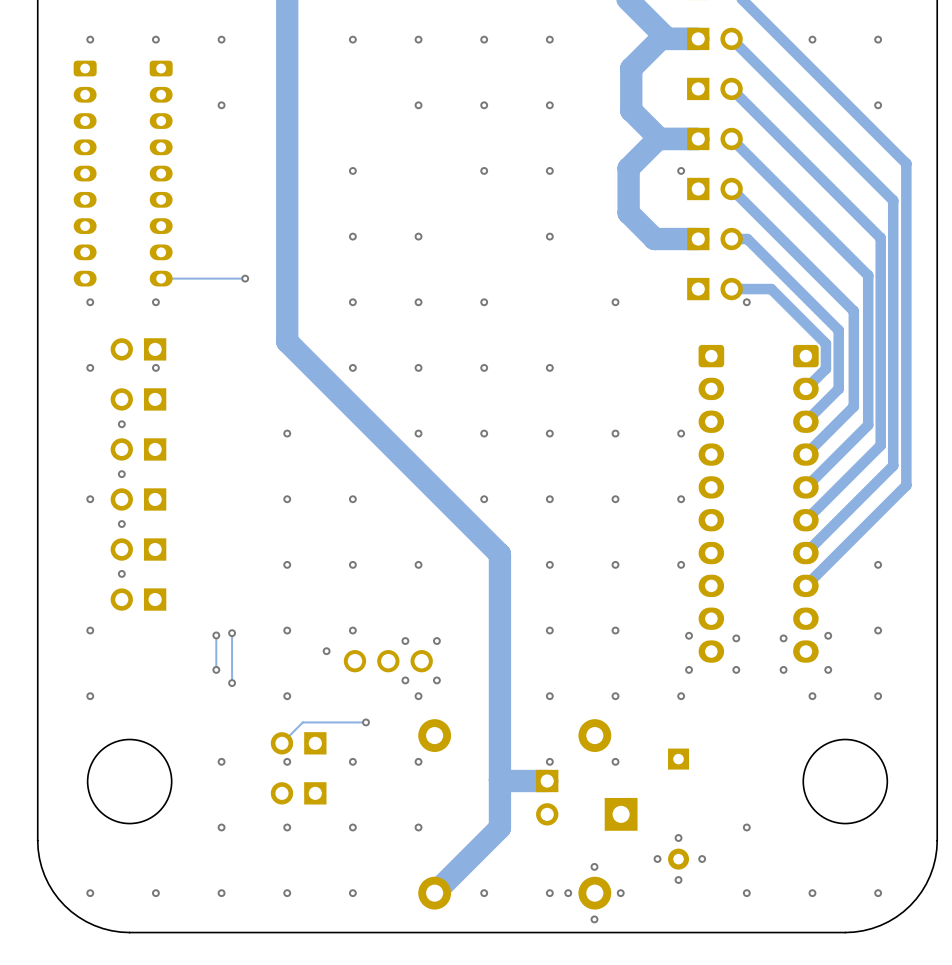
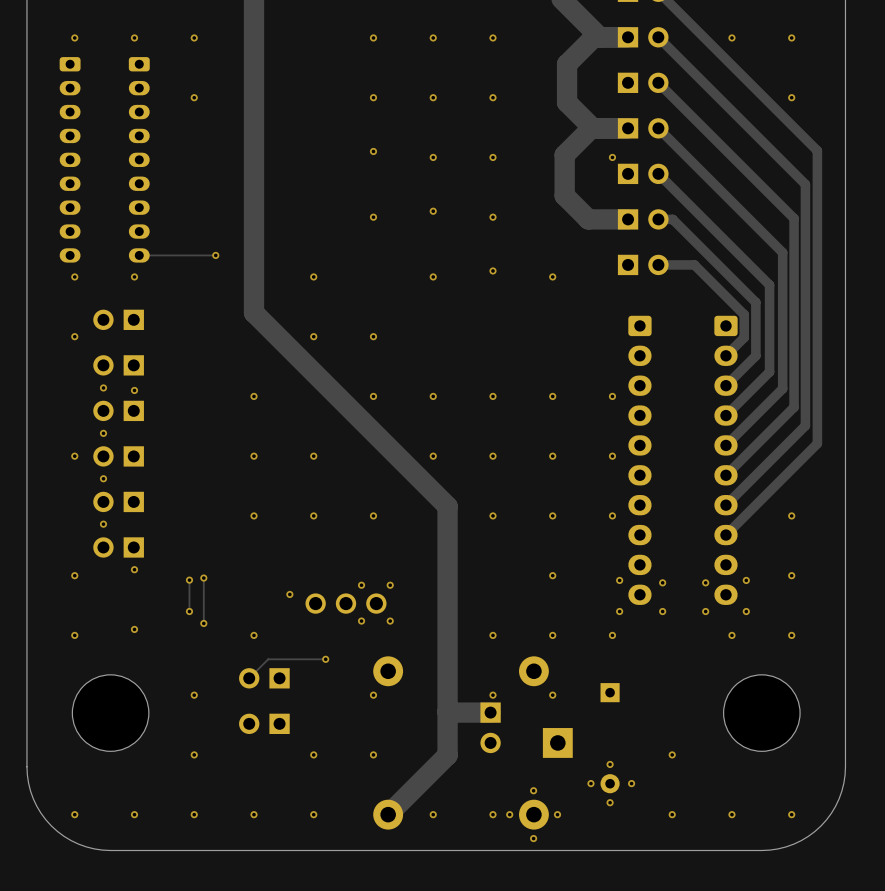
via: (352, 39) -> none
via: none -> (373, 151)
via: (352, 170) -> none
via: none -> (433, 211)
via: (352, 236) -> none
via: none -> (492, 270)
via: (418, 302) -> none
via: (746, 302) -> none
via position: (155, 367) -> (134, 390)
via: (484, 367) -> none
via: (549, 367) -> none
via: none -> (134, 569)
via: (287, 630) -> none
via: (352, 630) -> none
via: (549, 630) -> none
via: none -> (134, 629)
via: (418, 696) -> none
via: (287, 761) -> none
via: (352, 761) -> none
via: (287, 827) -> none

